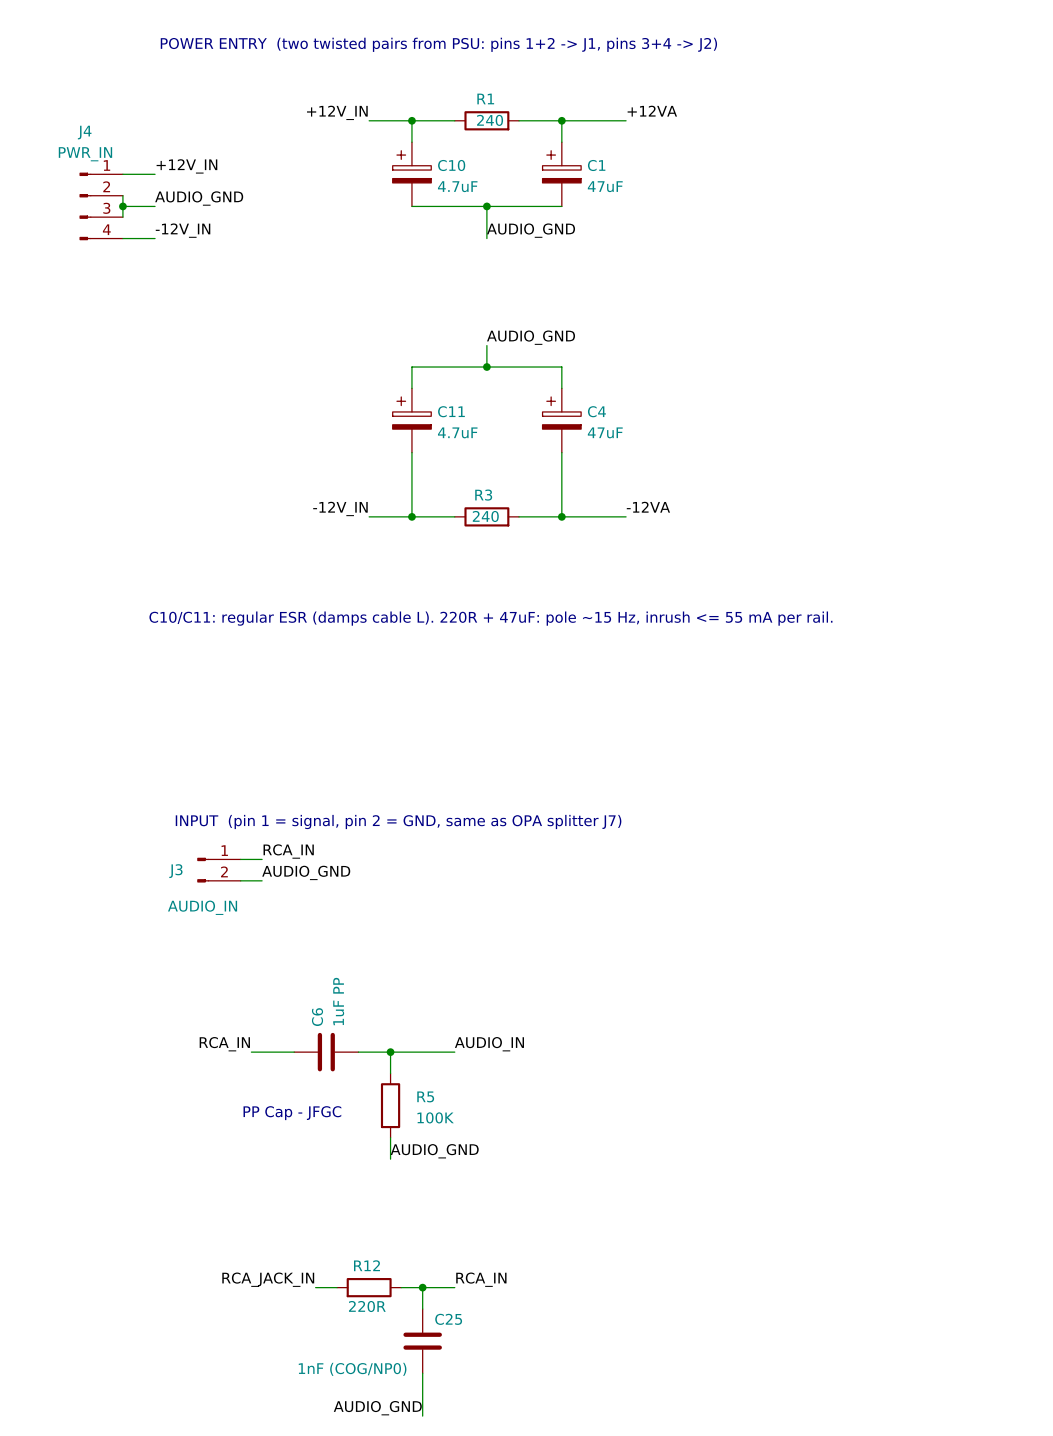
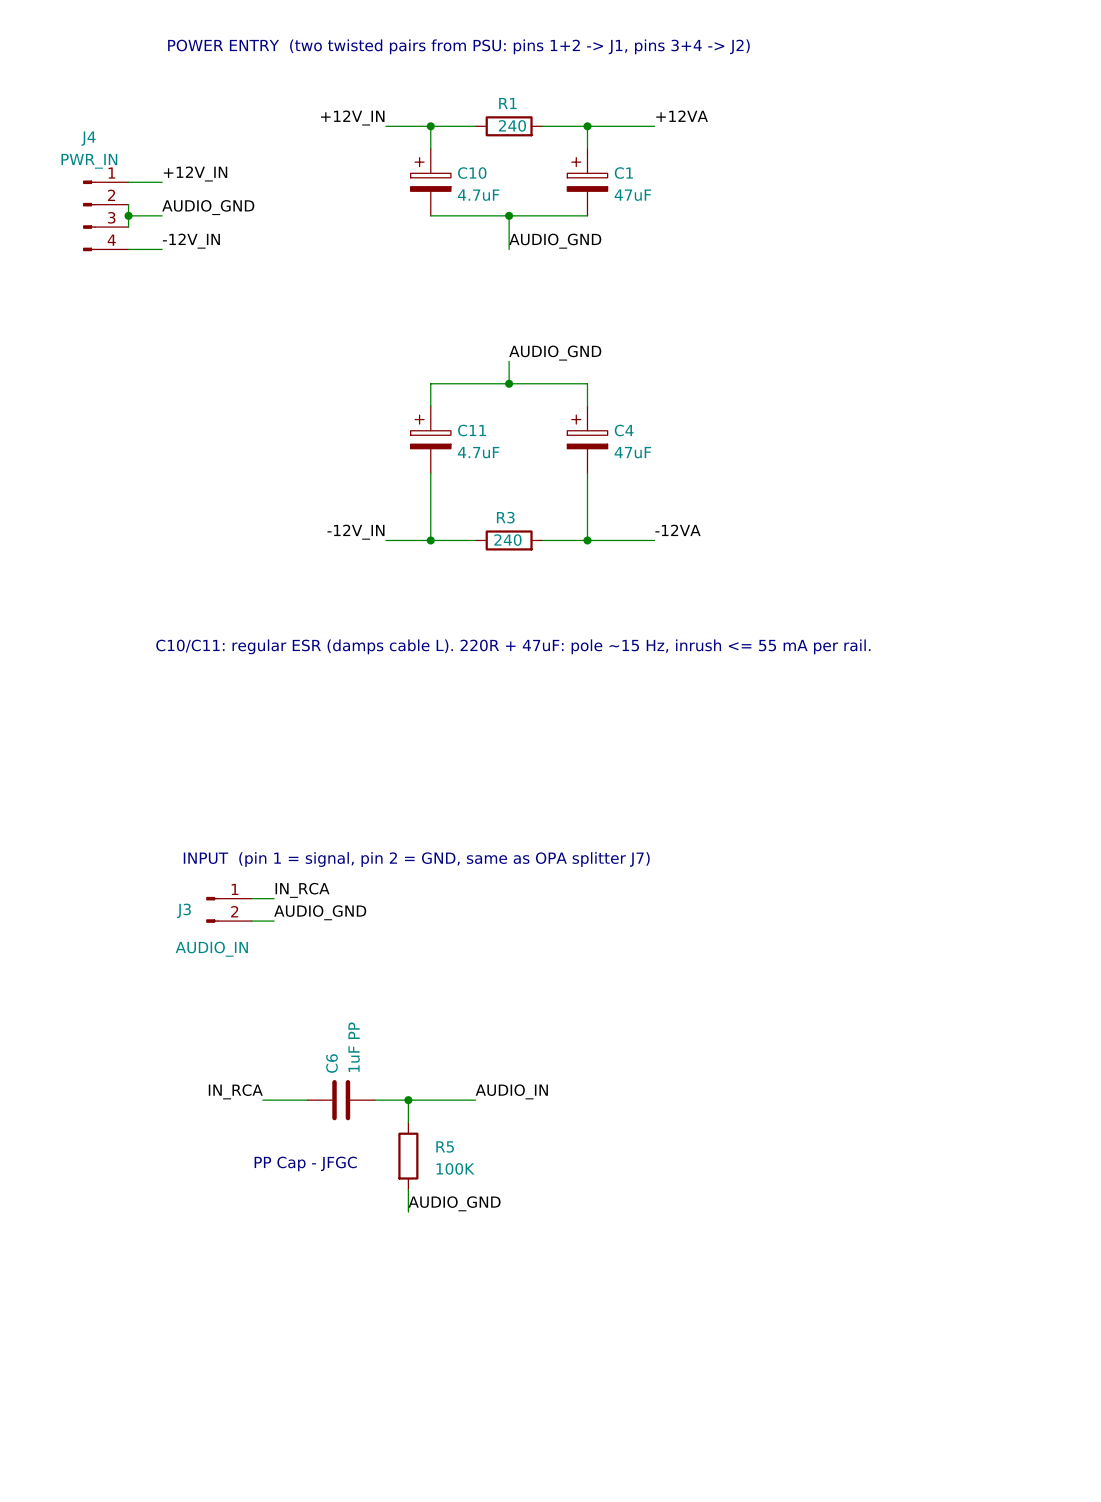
label: RCA_IN (288, 851) -> IN_RCA (302, 890)
label: RCA_IN (224, 1044) -> IN_RCA (235, 1091)
label: RCA_JACK_IN (268, 1279) -> none
label: RCA_IN (481, 1279) -> none
wire: (315, 1287) (337, 1287) -> none
R12: 220R (369, 1287) -> none
wire: (401, 1287) (454, 1287) -> none
wire: (422, 1287) (422, 1309) -> none
junction: (422, 1287) -> none
C25: 1nF (COG/NP0) (422, 1341) -> none
wire: (422, 1373) (422, 1416) -> none
label: AUDIO_GND (377, 1408) -> none

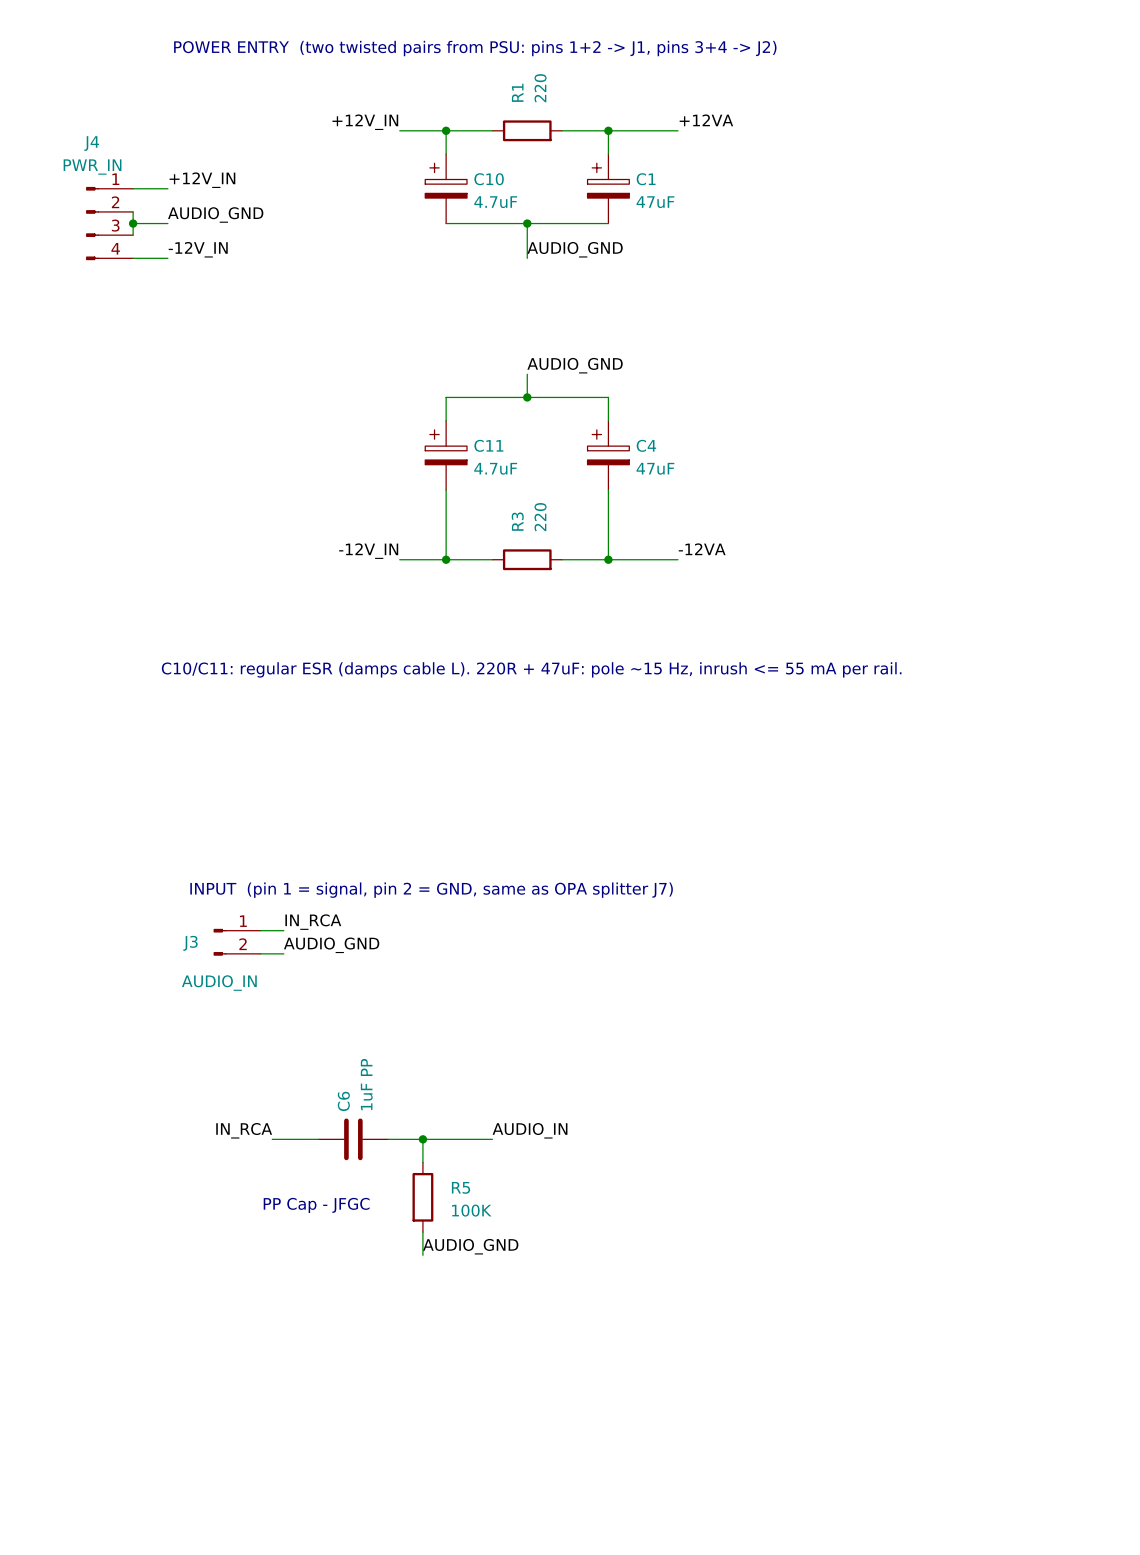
R1 name rotation: 0° (507, 103) -> 90° counterclockwise (517, 92)
R1 value: 240 (512, 125) -> 220 (540, 88)
R3 name rotation: 0° (505, 517) -> 90° counterclockwise (517, 521)
R3 value: 240 (507, 540) -> 220 (540, 517)

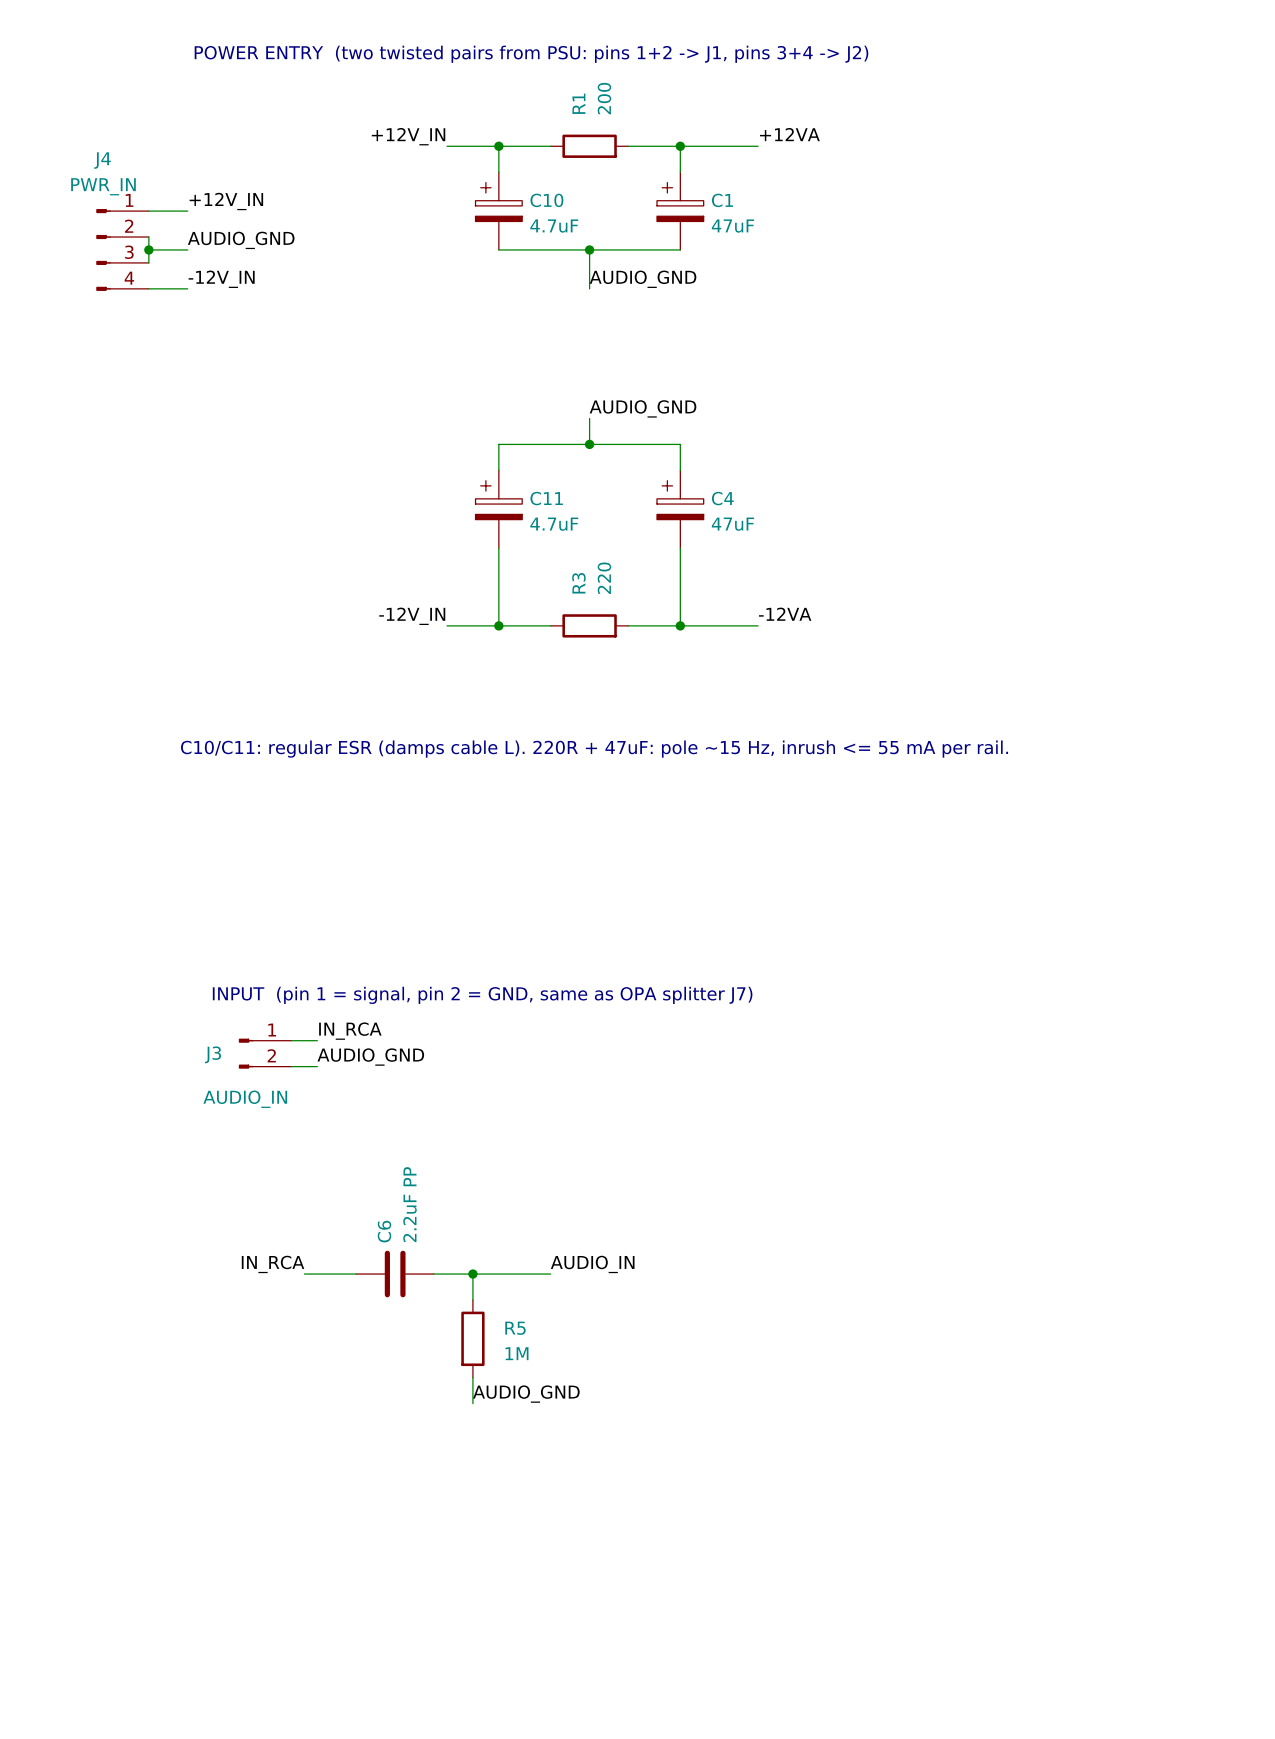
R1 value: 220 (540, 88) -> 200 (604, 98)
C6 value: 1uF PP (366, 1084) -> 2.2uF PP (409, 1204)
text: PP Cap - JFGC (316, 1205) -> none
R5 value: 100K (471, 1210) -> 1M (516, 1353)

